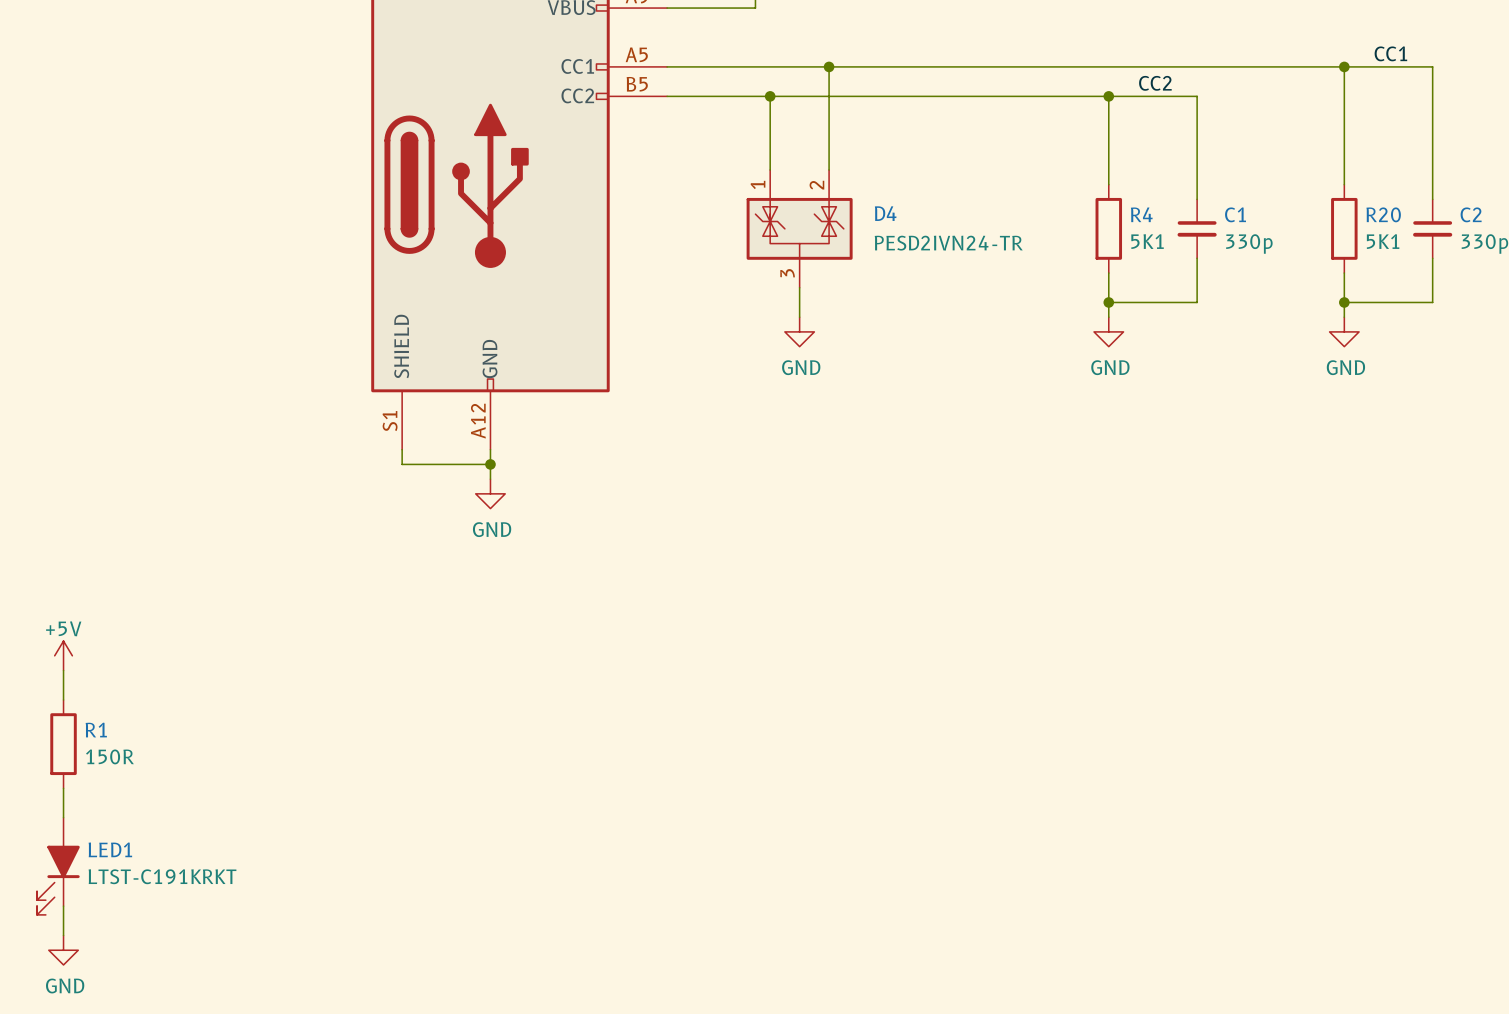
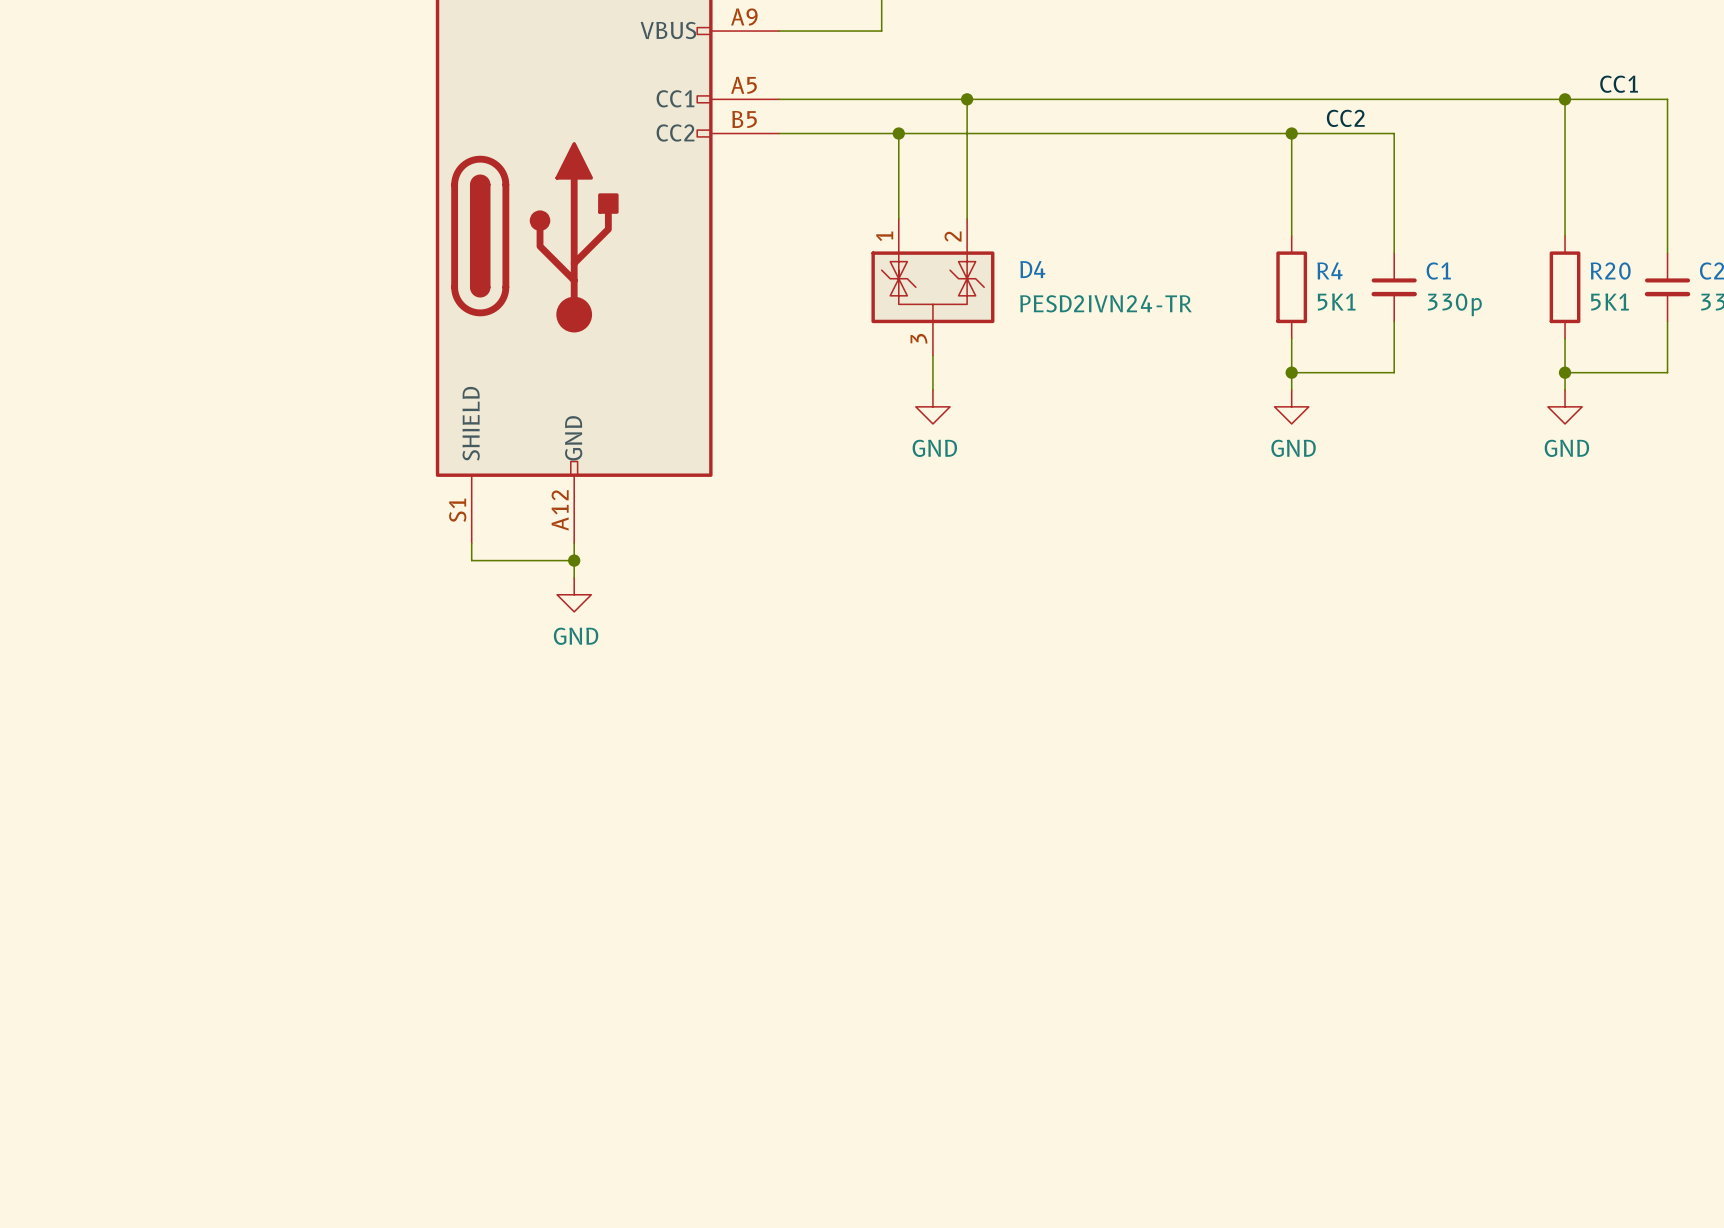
power symbol: +5V (63, 655) -> none
wire: (63, 670) (63, 699) -> none
R1: 150R (63, 744) -> none
wire: (63, 788) (63, 817) -> none
LED1: LTST-C191KRKT (58, 866) -> none
wire: (63, 906) (63, 935) -> none
power symbol: GND (63, 950) -> none

